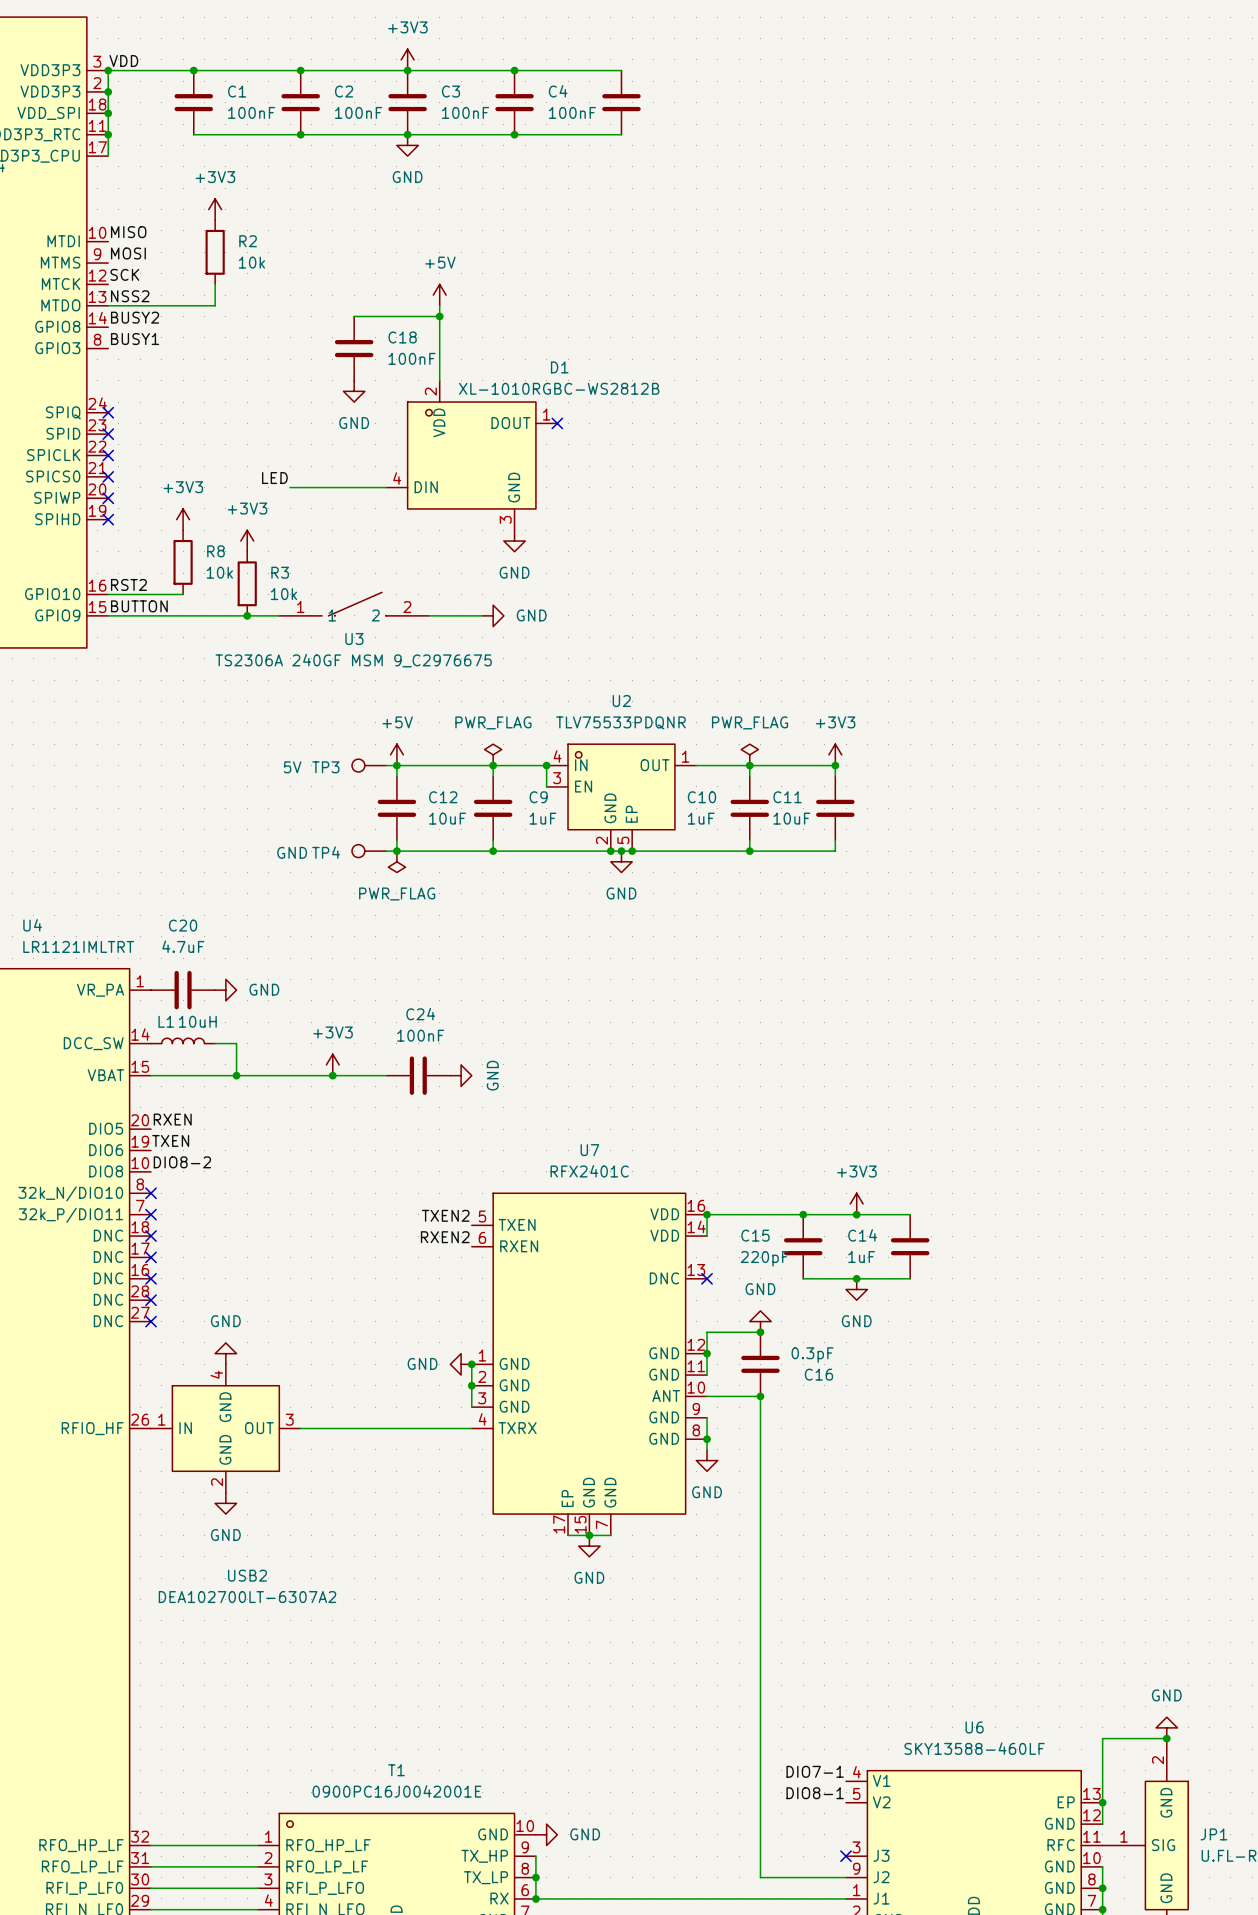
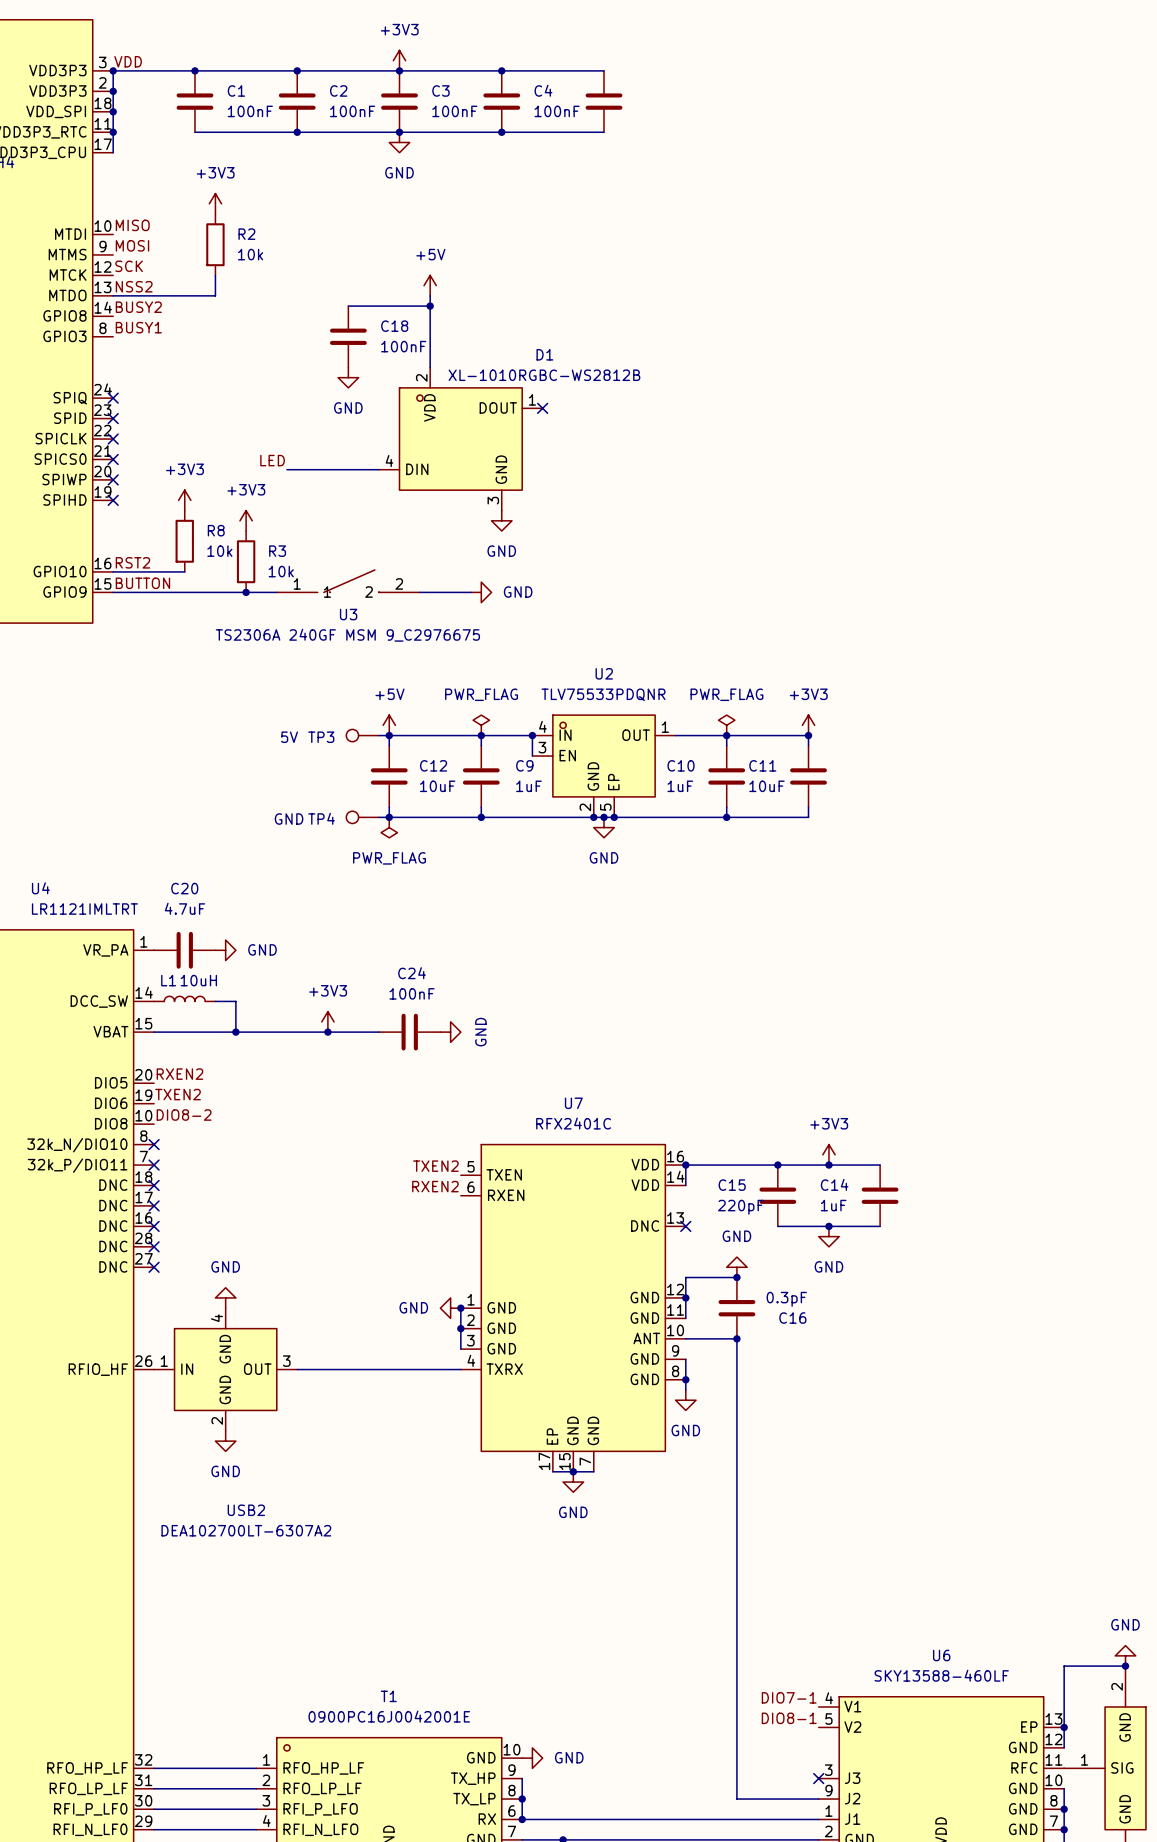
label: RXEN (172, 1119) -> RXEN2 (179, 1074)
label: TXEN (170, 1140) -> TXEN2 (178, 1094)

